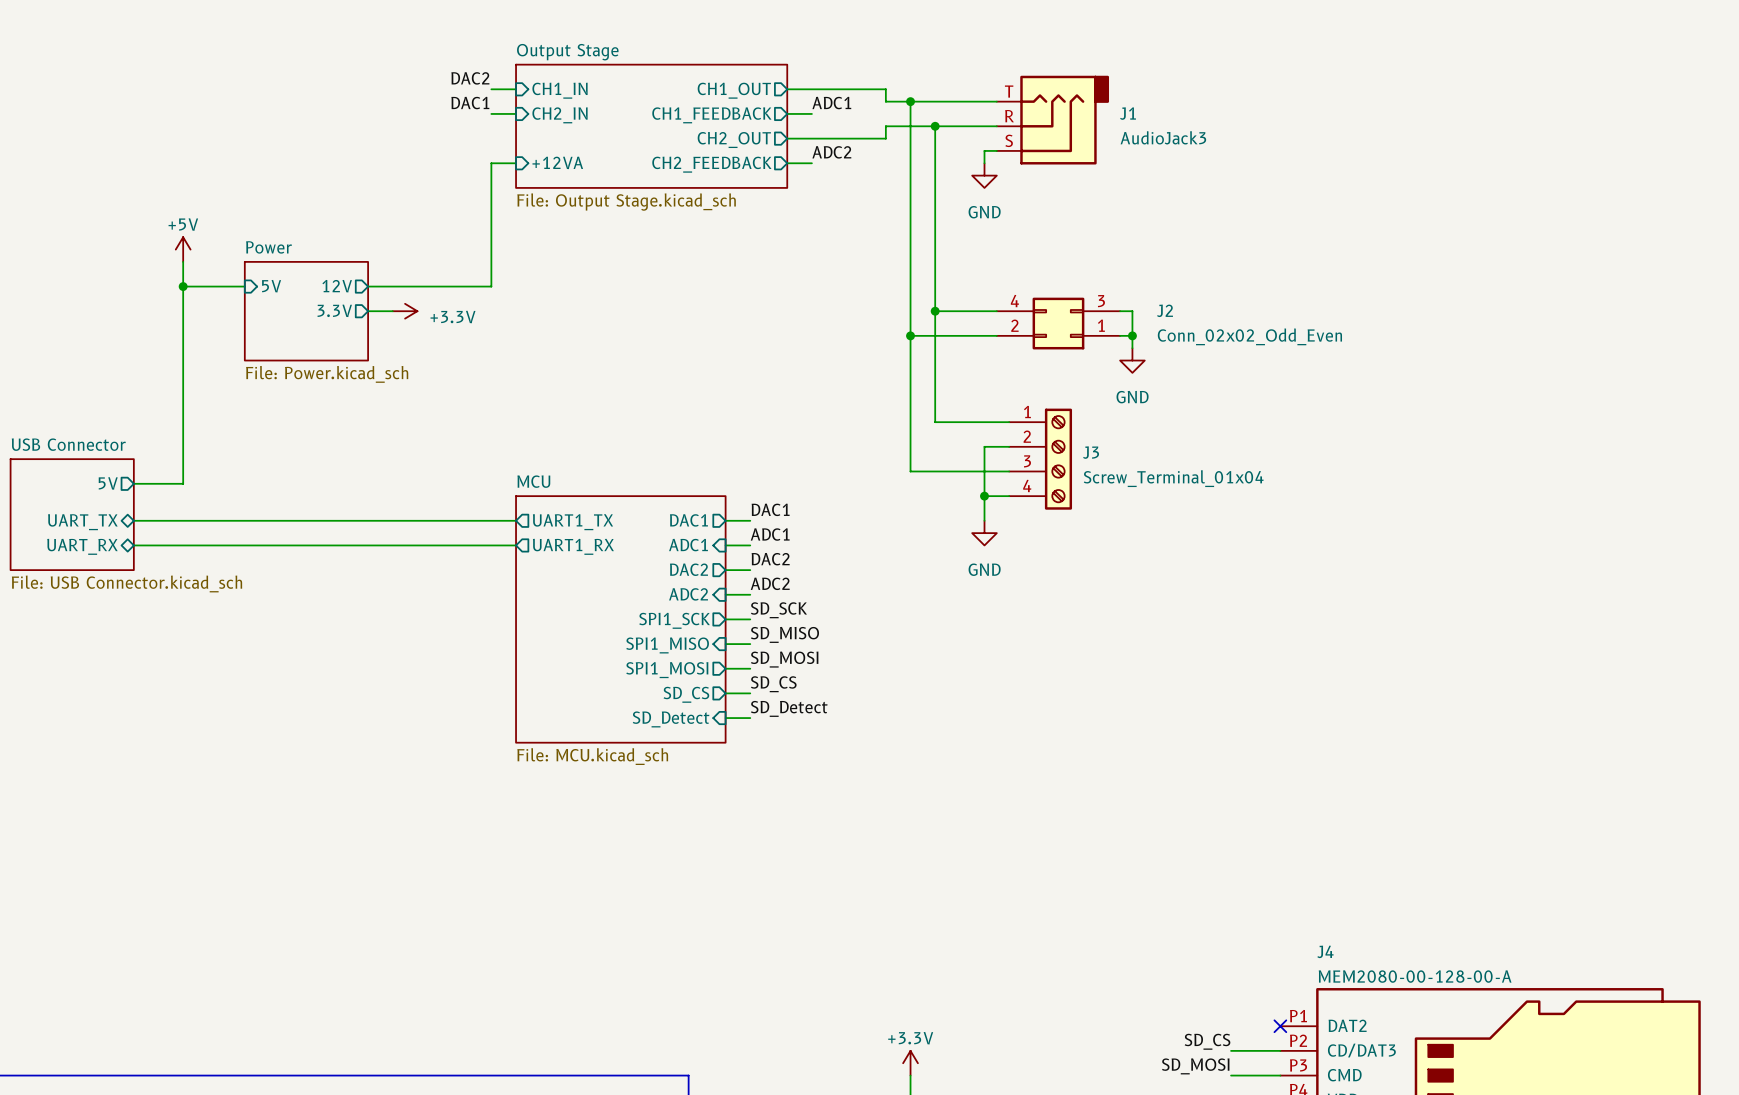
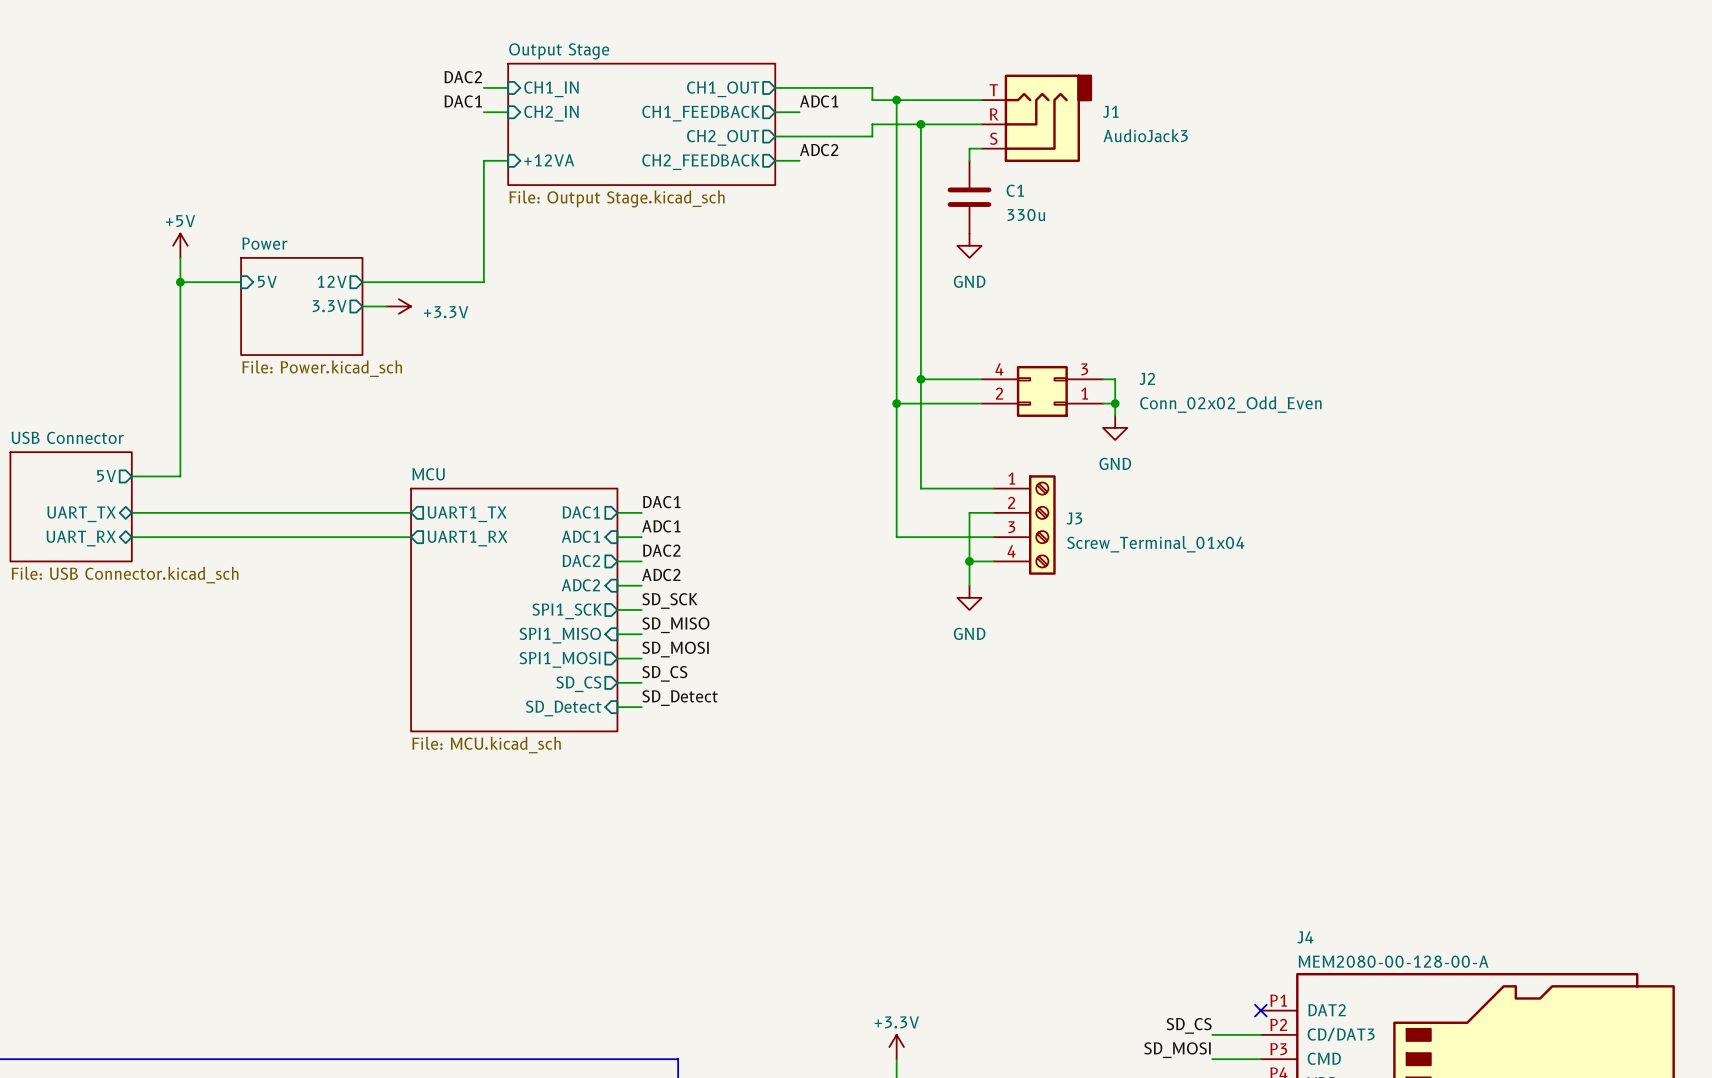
power symbol position: GND (984, 175) -> GND (969, 245)
C1: none -> 330u (969, 197)
wire: (935, 311) (996, 311) -> (920, 379) (981, 379)
junction: (935, 311) -> none
wire: (1120, 311) (1132, 311) (1132, 348) -> (1103, 379) (1115, 379) (1115, 415)
J2 position: (1058, 323) -> (1042, 391)
wire: (910, 335) (996, 335) -> (896, 403) (981, 403)
junction: (910, 335) -> none
wire: (1120, 335) (1132, 335) -> (1103, 403) (1115, 403)
junction: (1132, 335) -> none
power symbol position: GND (1132, 360) -> GND (1115, 427)
junction: none -> (920, 379)
junction: none -> (896, 403)
junction: none -> (1115, 403)
wire: (935, 422) (1009, 422) -> (920, 415) (920, 488) (969, 488)
wire: (1009, 446) (984, 446) (984, 520) -> (993, 512) (969, 512) (969, 585)
J3 position: (1040, 459) -> (1024, 525)
wire: (910, 471) (1009, 471) -> (896, 464) (896, 537) (993, 537)
junction: (984, 496) -> none
label position: DAC1 (770, 509) -> DAC1 (661, 502)
wire: (417, 520) (516, 520) -> none
sheet pin position: DAC1 (688, 520) -> DAC1 (581, 512)
wire: (725, 520) (750, 520) -> (617, 512) (641, 512)
sheet pin position: UART1_TX (572, 522) -> UART1_TX (467, 514)
power symbol position: GND (984, 533) -> GND (969, 597)
label position: ADC1 (770, 534) -> ADC1 (661, 526)
wire: (417, 545) (516, 545) -> none
sheet pin position: ADC1 (688, 545) -> ADC1 (580, 536)
wire: (725, 545) (750, 545) -> (617, 537) (641, 537)
sheet pin position: UART1_RX (573, 546) -> UART1_RX (467, 538)
label position: DAC2 (770, 559) -> DAC2 (661, 550)
sheet pin position: DAC2 (688, 569) -> DAC2 (581, 561)
wire: (725, 570) (750, 570) -> (617, 561) (641, 561)
wire: none -> (969, 561) (993, 561)
junction: none -> (969, 561)
label position: ADC2 (770, 583) -> ADC2 (661, 574)
sheet pin position: ADC2 (688, 594) -> ADC2 (580, 585)
wire: (725, 594) (750, 594) -> (617, 585) (641, 585)
label position: SD_SCK (778, 610) -> SD_SCK (669, 600)
sheet MCU position: (620, 619) -> (514, 609)
wire: (725, 619) (750, 619) -> (617, 609) (641, 609)
sheet pin position: SPI1_SCK (674, 620) -> SPI1_SCK (567, 611)
label position: SD_MISO (784, 634) -> SD_MISO (675, 625)
wire: (725, 644) (750, 644) -> (617, 634) (641, 634)
sheet pin position: SPI1_MISO (667, 645) -> SPI1_MISO (560, 635)
label position: SD_MOSI (784, 659) -> SD_MOSI (675, 649)
wire: (725, 668) (750, 668) -> (617, 658) (641, 658)
sheet pin position: SPI1_MOSI (667, 670) -> SPI1_MOSI (560, 659)
label position: SD_CS (773, 684) -> SD_CS (664, 673)
wire: (725, 693) (750, 693) -> (617, 682) (641, 682)
sheet pin position: SD_CS (686, 694) -> SD_CS (578, 684)
label position: SD_Detect (789, 708) -> SD_Detect (680, 698)
wire: (725, 718) (750, 718) -> (617, 707) (641, 707)
sheet pin position: SD_Detect (671, 719) -> SD_Detect (563, 708)

